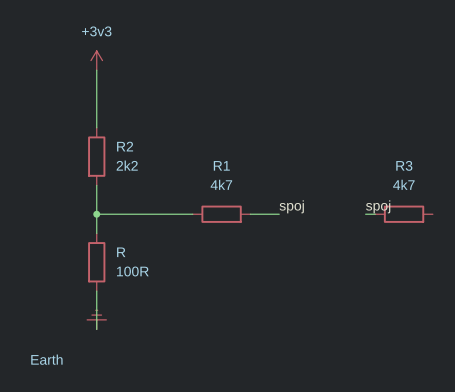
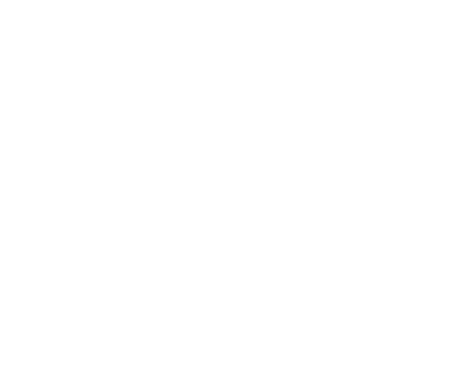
power symbol: +3v3 (96, 60) -> none
wire: (96, 70) (96, 127) -> none
R2: 2k2 (96, 156) -> none
wire: (96, 185) (96, 233) -> none
label: spoj (291, 206) -> none
label: spoj (378, 206) -> none
wire: (96, 214) (192, 214) -> none
junction: (96, 214) -> none
R1: 4k7 (221, 214) -> none
wire: (250, 214) (279, 214) -> none
wire: (365, 214) (375, 214) -> none
R3: 4k7 (404, 214) -> none
R: 100R (96, 262) -> none
wire: (96, 291) (96, 329) -> none
power symbol: Earth (96, 319) -> none

